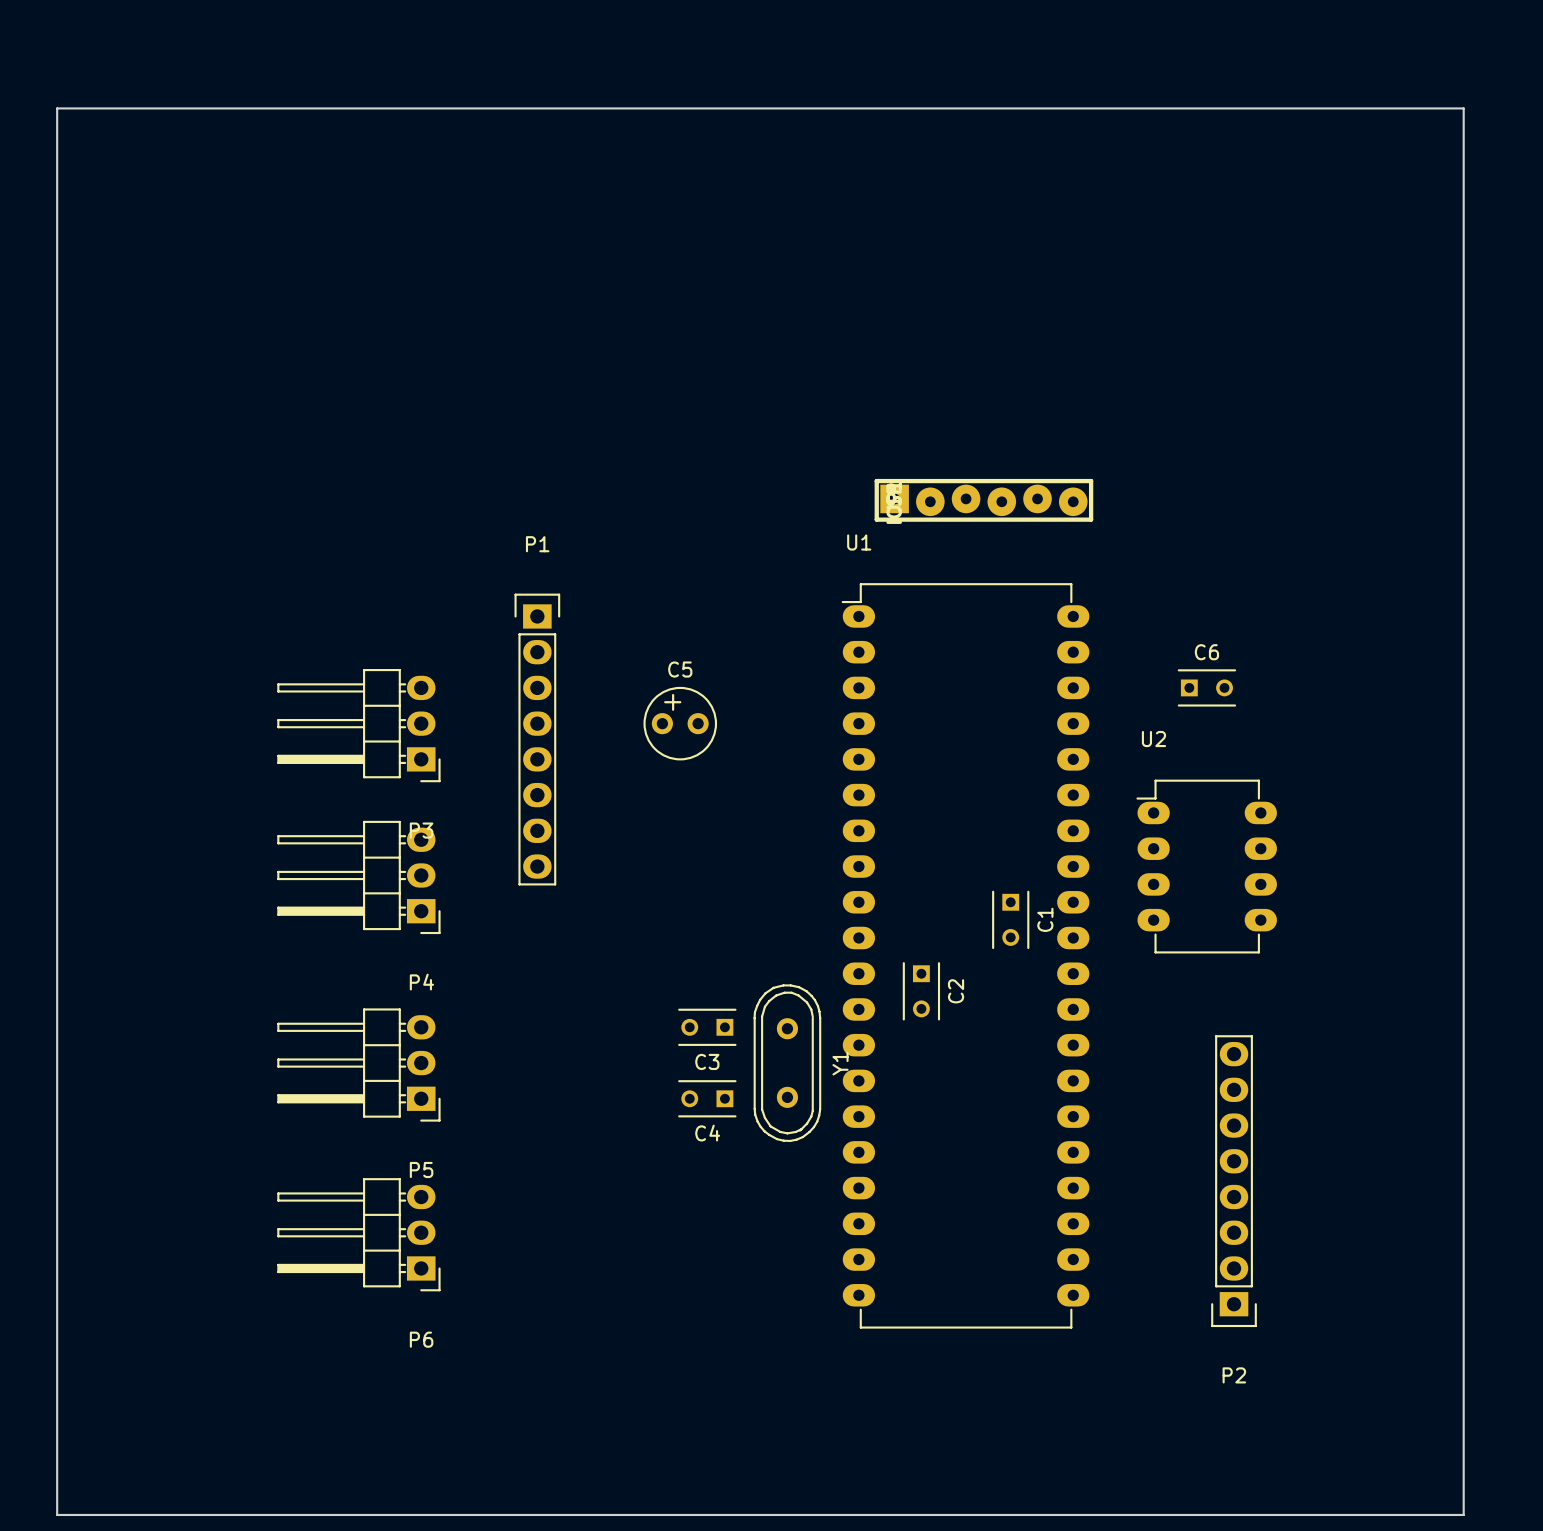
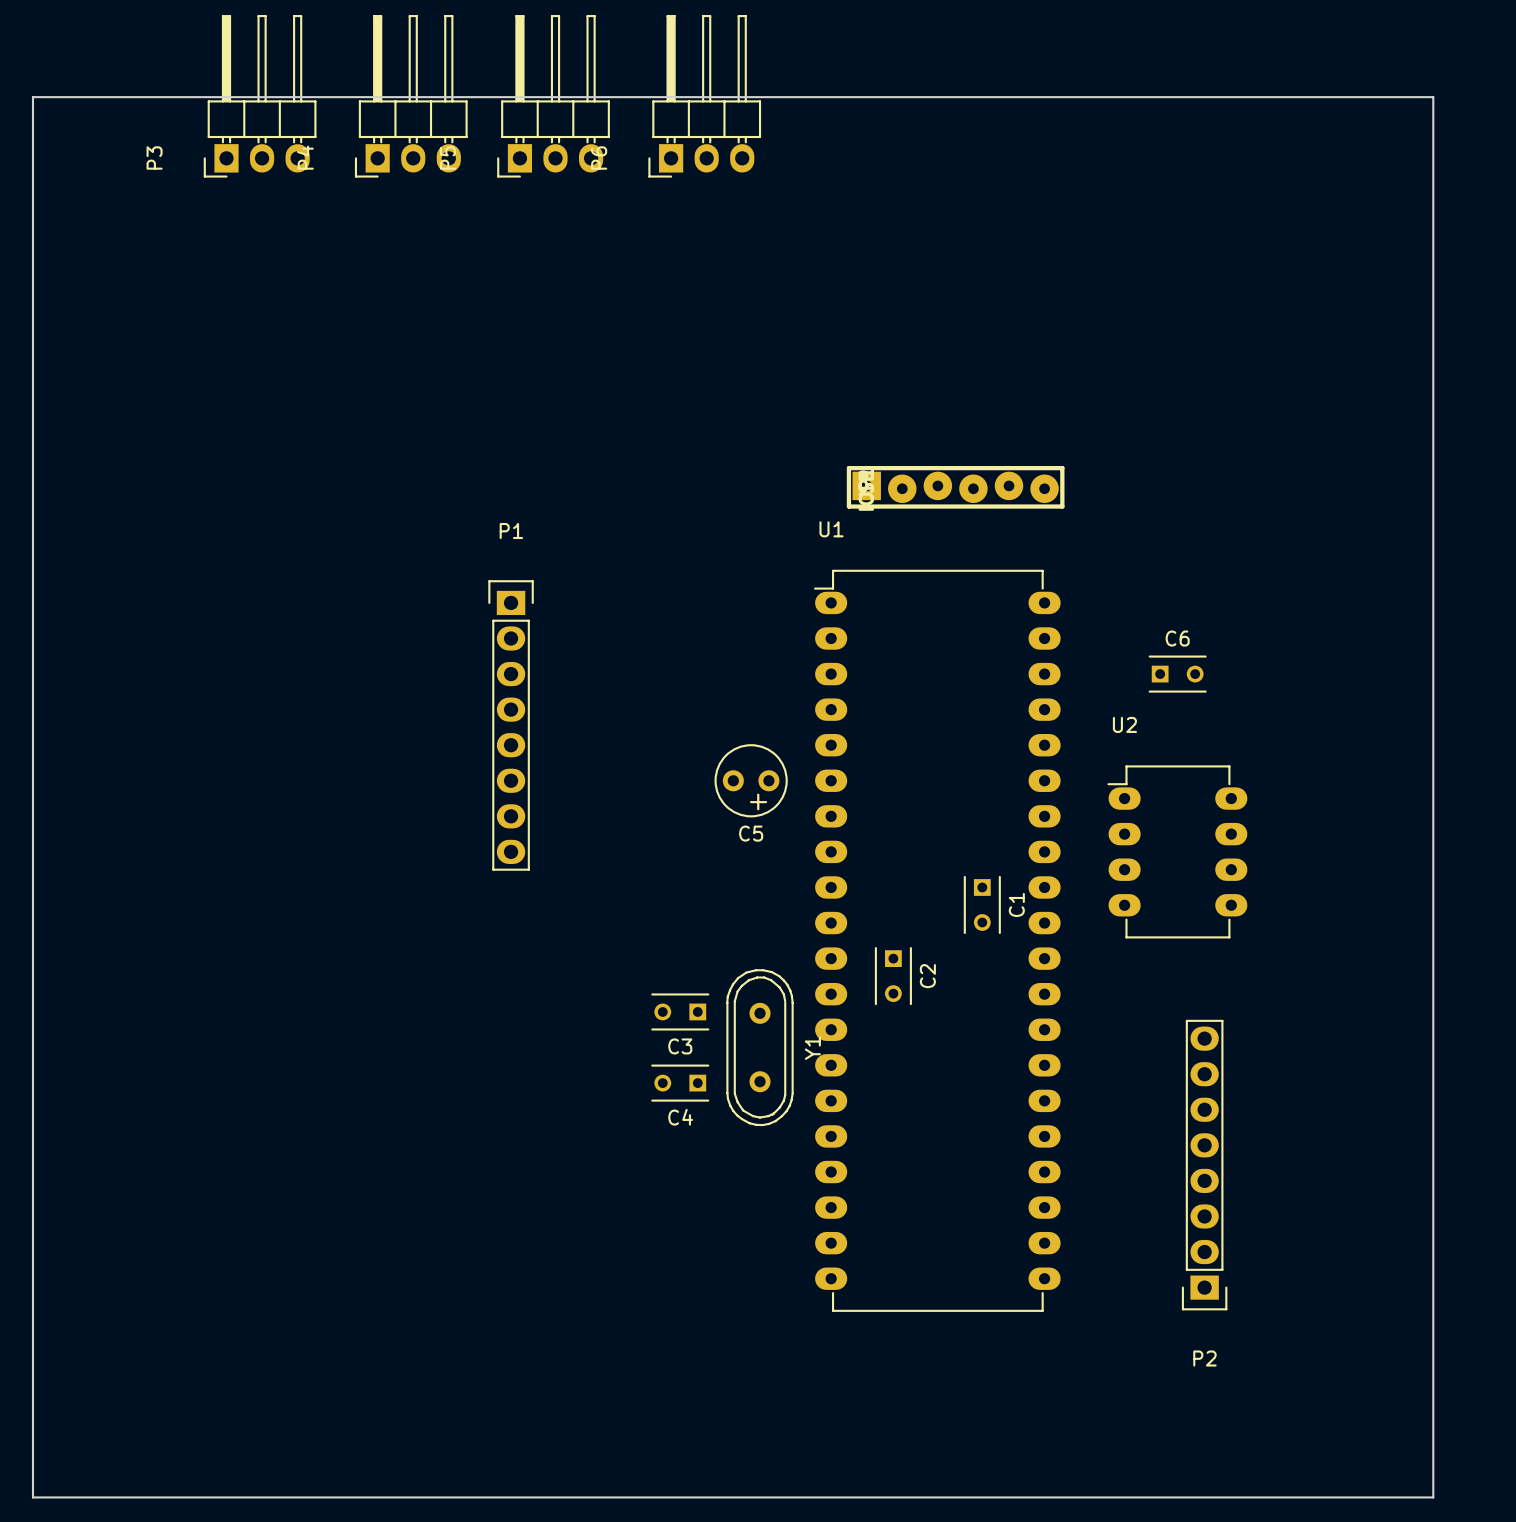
C5 rotation: 0° (680, 723) -> 180° (751, 780)
C5 position: (680, 723) -> (751, 780)
P3 rotation: 0° (358, 725) -> 90° clockwise (260, 96)
P3 position: (358, 725) -> (260, 96)
P4 rotation: 0° (358, 877) -> 90° clockwise (411, 96)
P4 position: (358, 877) -> (411, 96)
P5 rotation: 0° (358, 1065) -> 90° clockwise (553, 96)
P5 position: (358, 1065) -> (553, 96)
P6 rotation: 0° (358, 1234) -> 90° clockwise (704, 96)
P6 position: (358, 1234) -> (704, 96)

